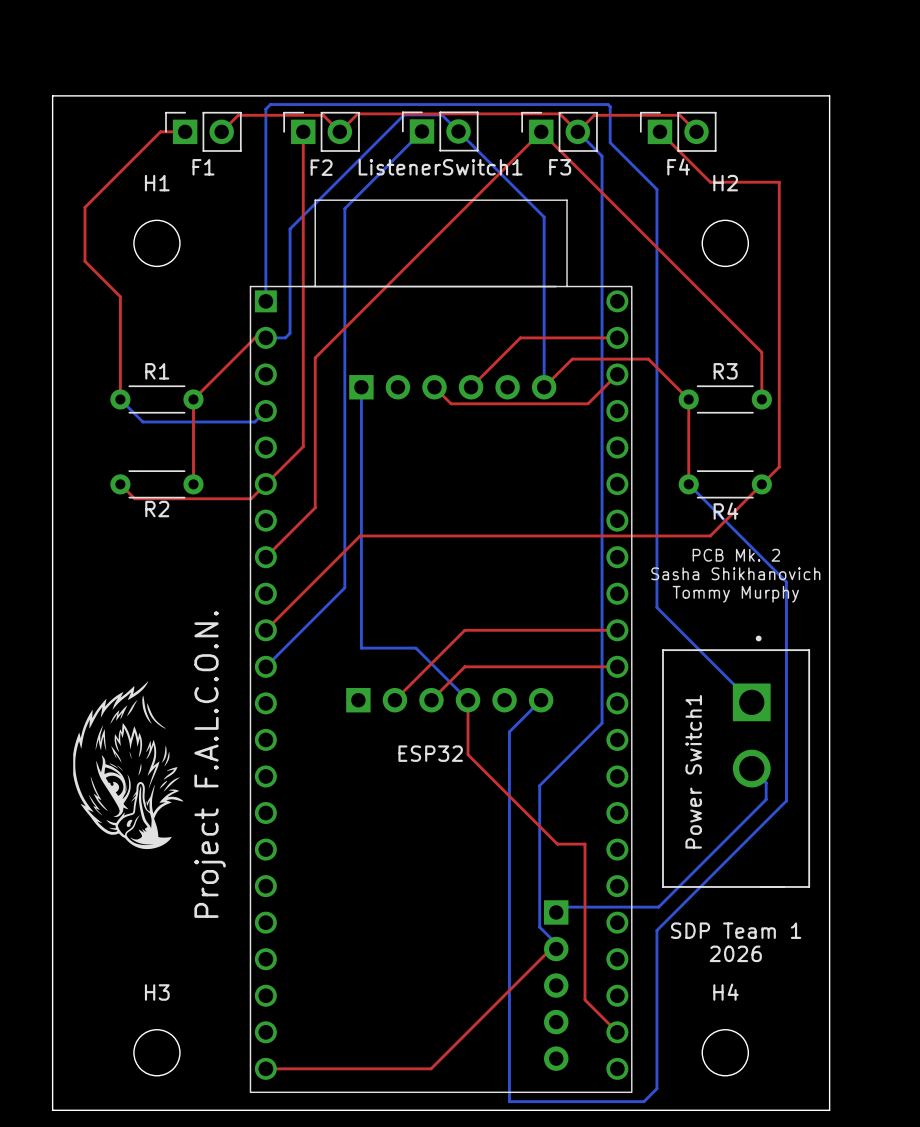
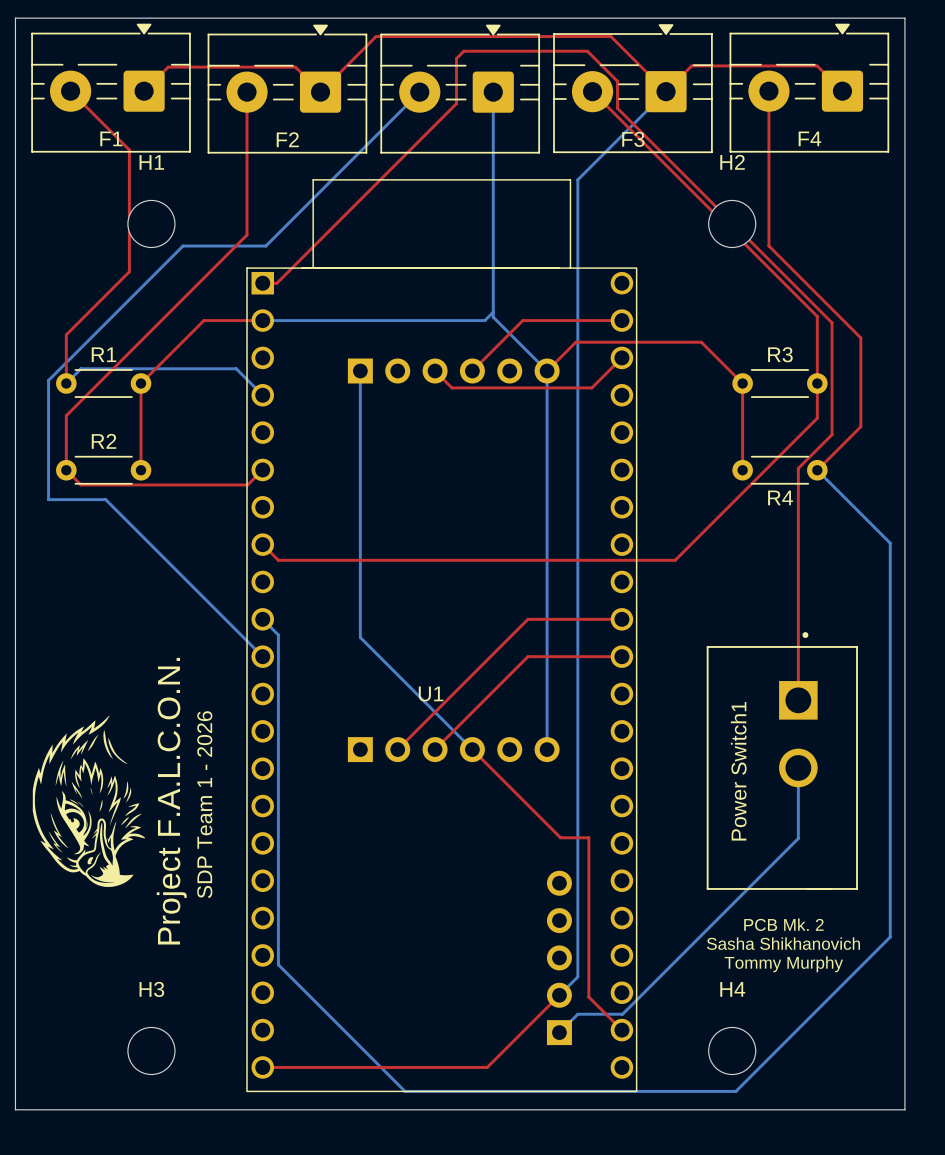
F1 footprint: [165, 111, 242, 152] -> [31, 23, 191, 153]
F2 footprint: [283, 111, 360, 152] -> [207, 24, 368, 154]
part: none -> (460, 89)
F3 footprint: [521, 111, 598, 152] -> [553, 24, 713, 154]
F4 footprint: [639, 111, 717, 152] -> [729, 23, 890, 153]
top track: none -> (70, 91) (129, 149) (129, 271) (66, 334) (66, 383)
top track: none -> (144, 91) (168, 67) (295, 67) (320, 92) (376, 36) (610, 36) (666, 91) (691, 65) (817, 65) (842, 91)
bottom track: none -> (666, 91) (577, 179) (577, 976) (559, 995)
top track: none -> (768, 91) (768, 246) (860, 337) (860, 426) (817, 470)
bottom track: none -> (493, 92) (493, 317) (547, 371) (547, 749)
top track: (185, 131) (160, 131) (84, 207) (84, 261) (120, 296) (120, 399) -> none
top track: (221, 131) (238, 115) (323, 115) (339, 131) (357, 113) (559, 113) (577, 131) (594, 115) (679, 115) (696, 131) -> none
top track: (303, 131) (303, 446) (265, 484) -> none
bottom track: (421, 131) (344, 208) (344, 587) (265, 666) -> (419, 92) (265, 246) (182, 246) (48, 380) (48, 499) (105, 499) (262, 656)
ListenerSwitch1: (440, 131) -> none
bottom track: (577, 131) (602, 156) (602, 723) (539, 785) (539, 927) (556, 943) (556, 948) -> none
top track: (659, 131) (710, 182) (779, 182) (779, 466) (710, 535) (360, 535) (265, 630) -> none
top track: none -> (262, 283) (276, 283) (456, 103) (456, 58) (463, 51) (587, 51) (617, 81) (617, 108) (832, 322) (832, 434) (798, 468) (798, 700)
bottom track: (265, 301) (265, 109) (270, 104) (608, 104) (610, 106) (610, 142) (656, 189) (656, 607) (751, 702) -> none
top track: (255, 337) (193, 399) (193, 484) -> (251, 320) (203, 320) (141, 383) (141, 470)
bottom track: (285, 337) (290, 333) (290, 228) (404, 114) (441, 114) (544, 217) (544, 387) -> (282, 320) (484, 320) (493, 312)
top track: (648, 359) (688, 399) (688, 484) -> (653, 342) (701, 342) (742, 383) (742, 470)
bottom track: (120, 399) (142, 422) (254, 422) (265, 410) -> (66, 383) (81, 368) (236, 368) (262, 395)
R1 position: (156, 399) -> (103, 383)
R3 position: (725, 399) -> (779, 383)
top track: (761, 399) (761, 352) (541, 131) (315, 357) (315, 507) (265, 557) -> (592, 91) (817, 316) (817, 418) (675, 560) (278, 560) (262, 544)
top track: (120, 484) (134, 498) -> (247, 92) (247, 235) (66, 415) (66, 470) (81, 484) (128, 484)
R2 position: (156, 484) -> (103, 470)
bottom track: (688, 484) (786, 582) (786, 800) (656, 930) (656, 1088) (644, 1101) (509, 1101) (509, 731) (544, 697) -> none
R4 position: (725, 484) -> (779, 470)
bottom track: none -> (817, 470) (890, 543) (890, 937) (735, 1091) (405, 1091) (278, 964) (278, 635) (262, 619)
R2 name position: R2 (157, 509) -> R2 (104, 441)
text: PCB Mk. 2 (736, 555) -> none
text: Sasha Shikhanovich (735, 573) -> none
text: Tommy Murphy (735, 594) -> none
top track: (525, 630) (464, 630) (394, 700) -> (527, 619) (397, 749)
bottom track: (361, 648) (415, 648) (468, 700) -> (360, 637) (472, 749)
top track: (525, 666) (464, 666) (431, 700) -> (527, 656) (435, 749)
part position: (449, 700) -> (453, 749)
top track: (468, 700) (468, 754) (471, 757) -> none
ESP32 name: ESP32 (430, 753) -> U1 (431, 694)
Power Switch1 position: (736, 761) -> (782, 761)
Project F.A.L.C.O.N. position: (128, 765) -> (88, 801)
bottom track: (751, 768) (766, 782) (766, 799) (658, 907) (561, 907) (556, 912) -> none
bottom track: none -> (798, 767) (798, 838) (622, 1014) (577, 1014) (559, 1032)
text: none -> SDP Team 1 - 2026 (204, 804)
text: none -> PCB Mk. 2 (783, 924)
text: SDP Team 1 (736, 930) -> none
text: none -> Sasha Shikhanovich (783, 943)
top track: (556, 948) (550, 948) (431, 1068) -> (559, 995) (487, 1067) (431, 1067)
text: 2026 (735, 953) -> none
text: none -> Tommy Murphy (783, 964)
part rotation: 0° (556, 985) -> 180° (559, 957)
board edge: (52, 1110) (52, 95) (829, 95) (829, 1110) -> (44, 1109) (15, 1109) (15, 18) (904, 18) (904, 1109) (838, 1109)

